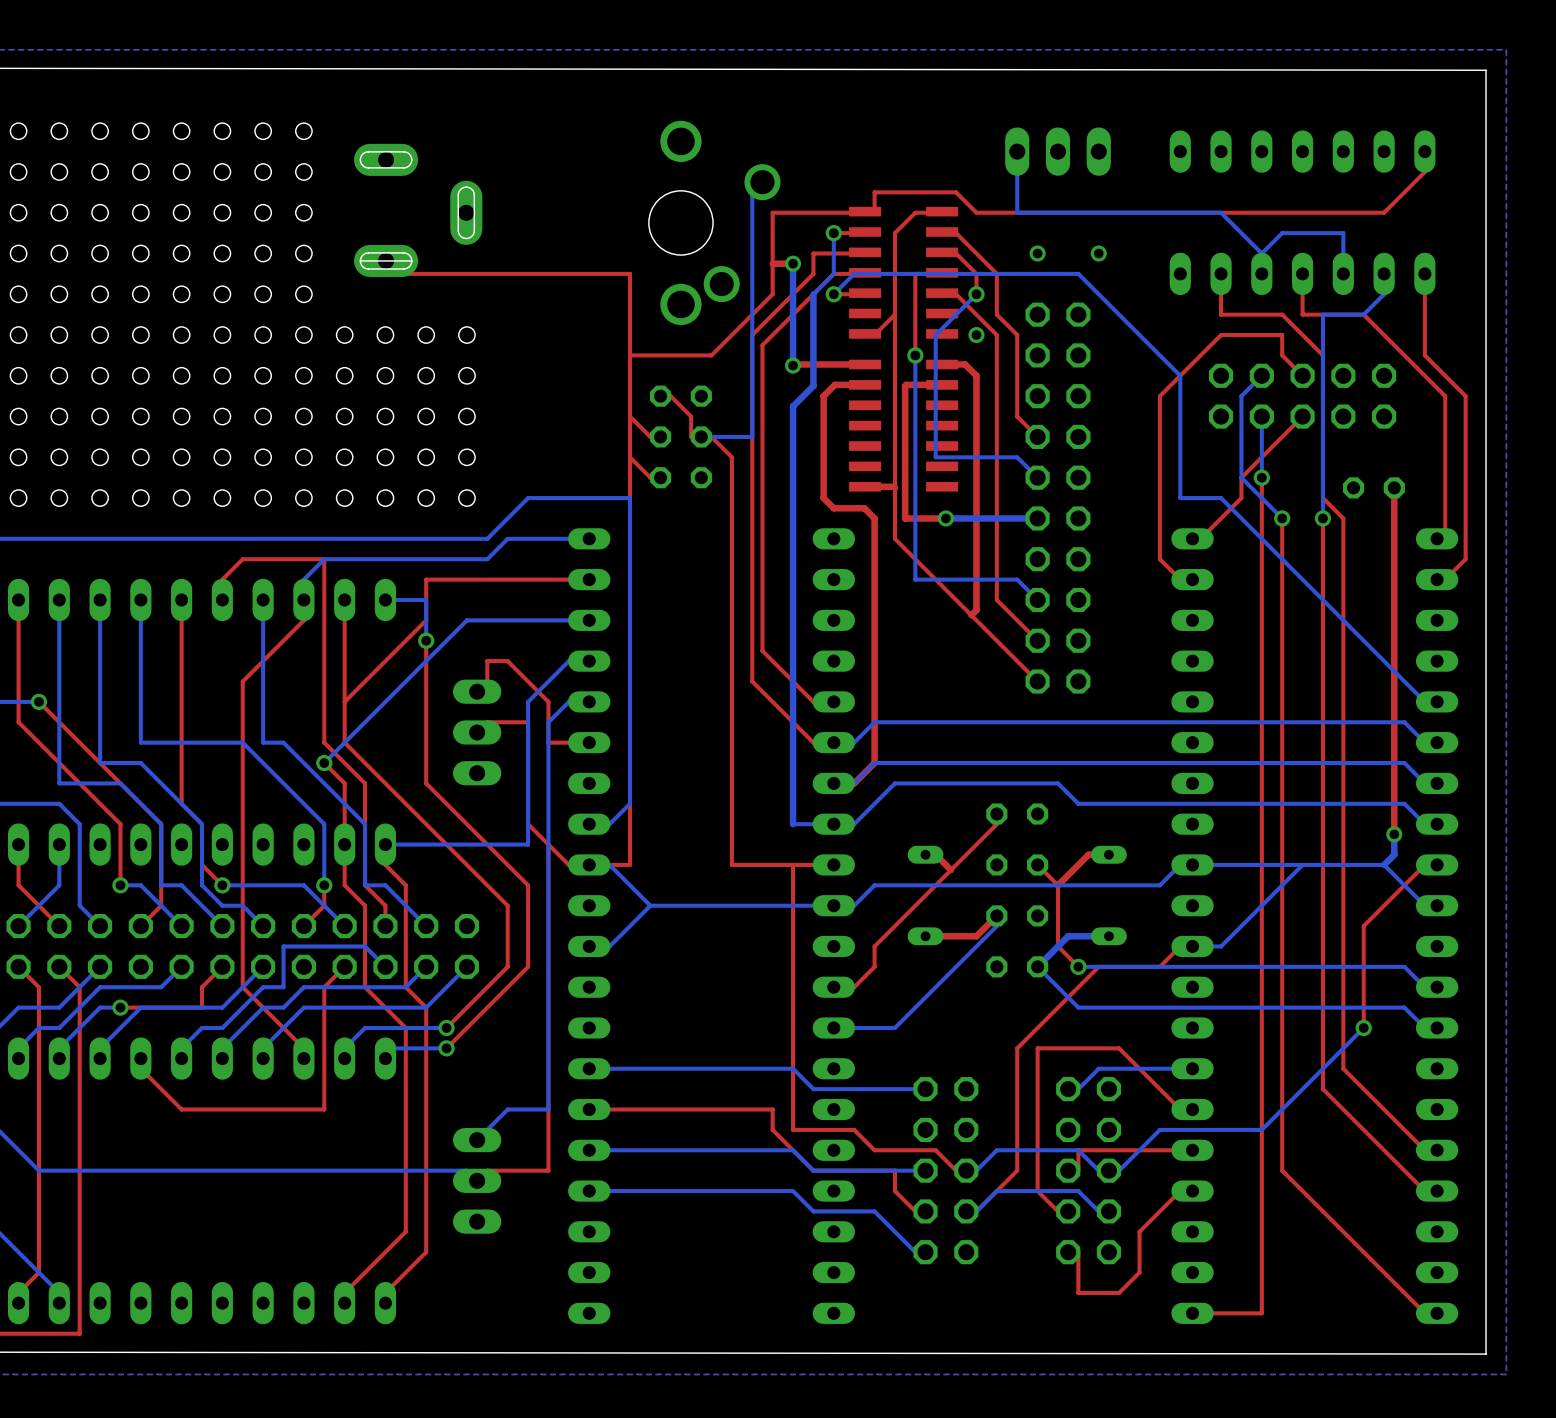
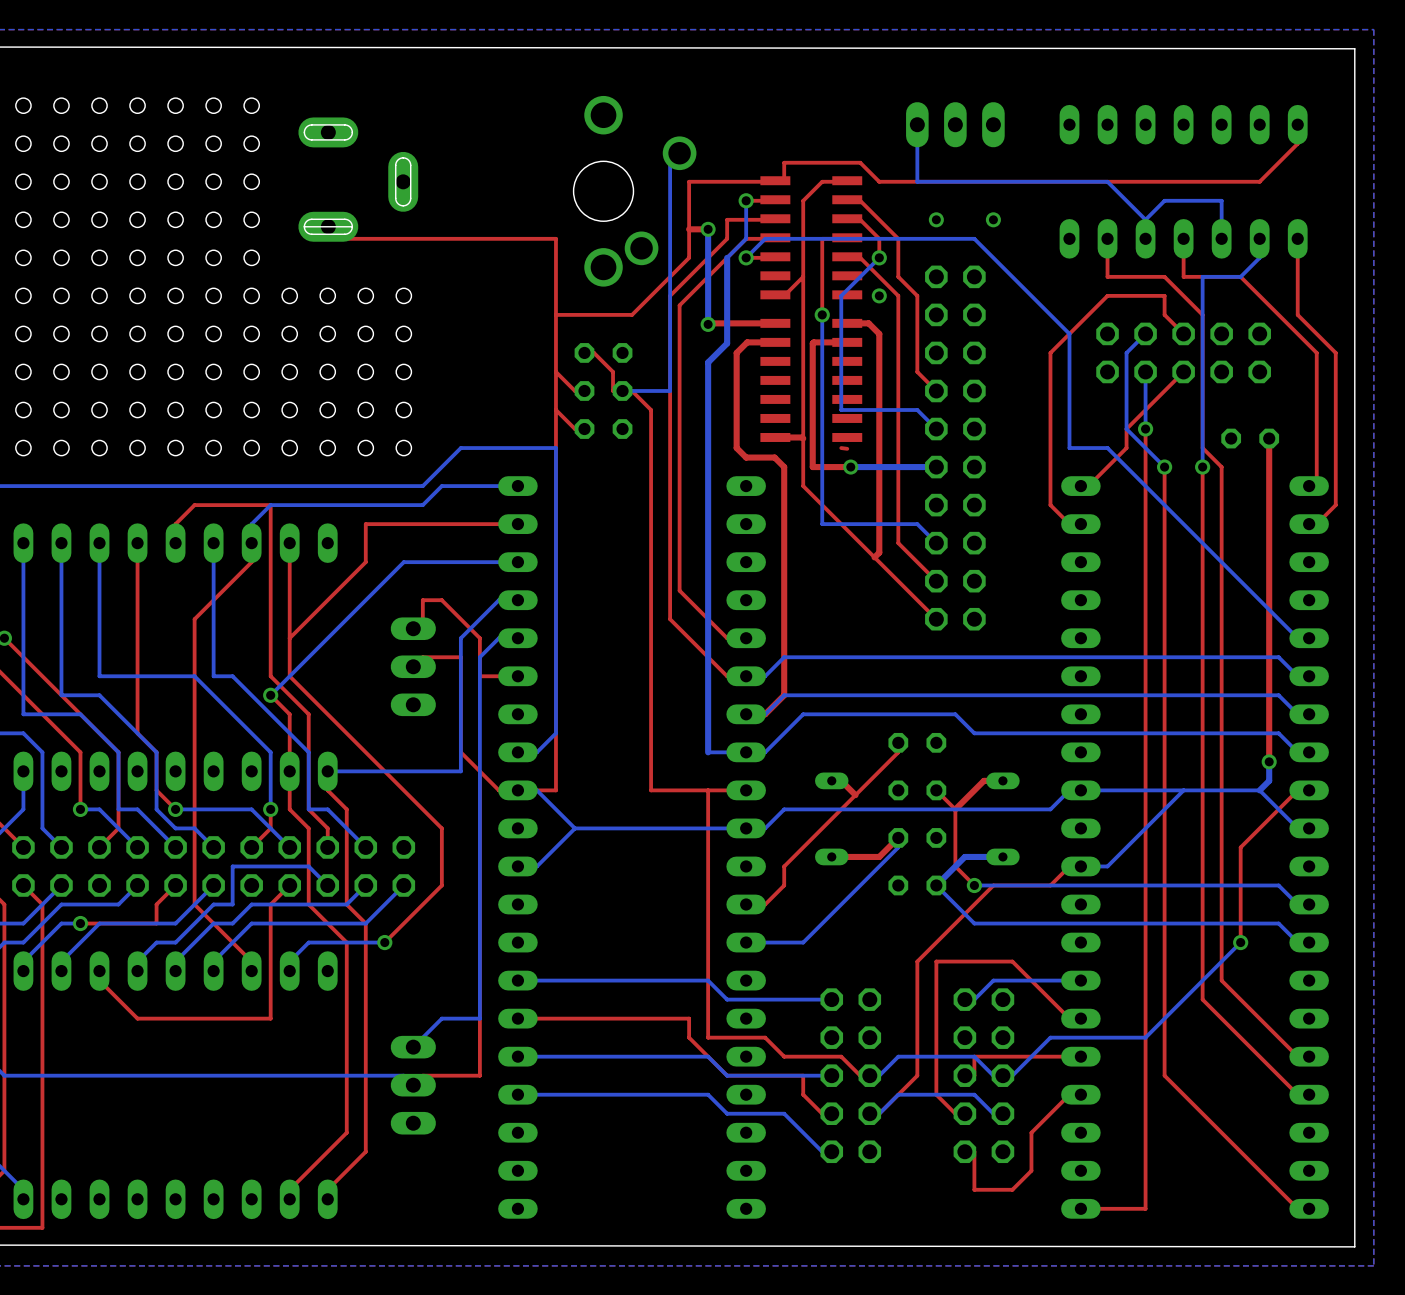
top track: none -> (841, 448) (847, 448)
bottom track: (385, 599) (426, 599) (426, 640) -> none
top track: (426, 640) (426, 783) (528, 885) (528, 966) (446, 1048) -> none
via: (426, 640) -> none
bottom track: (446, 1048) (385, 1048) (385, 1058) -> none
via: (446, 1048) -> none

